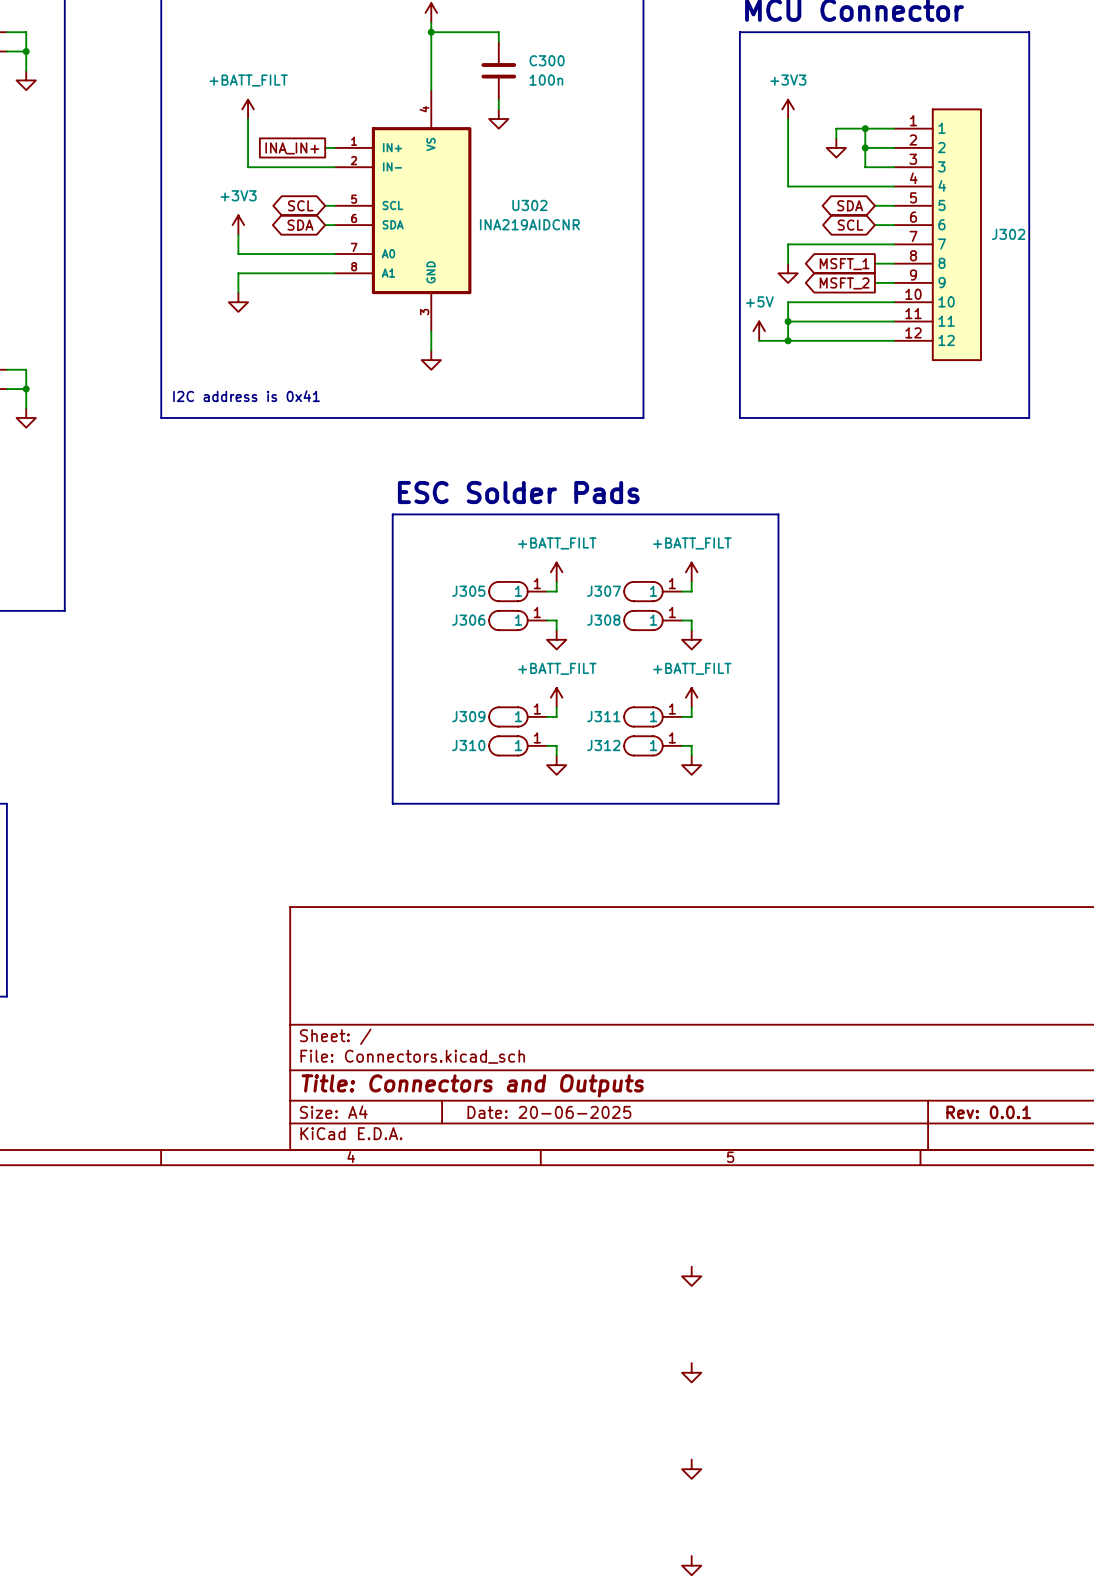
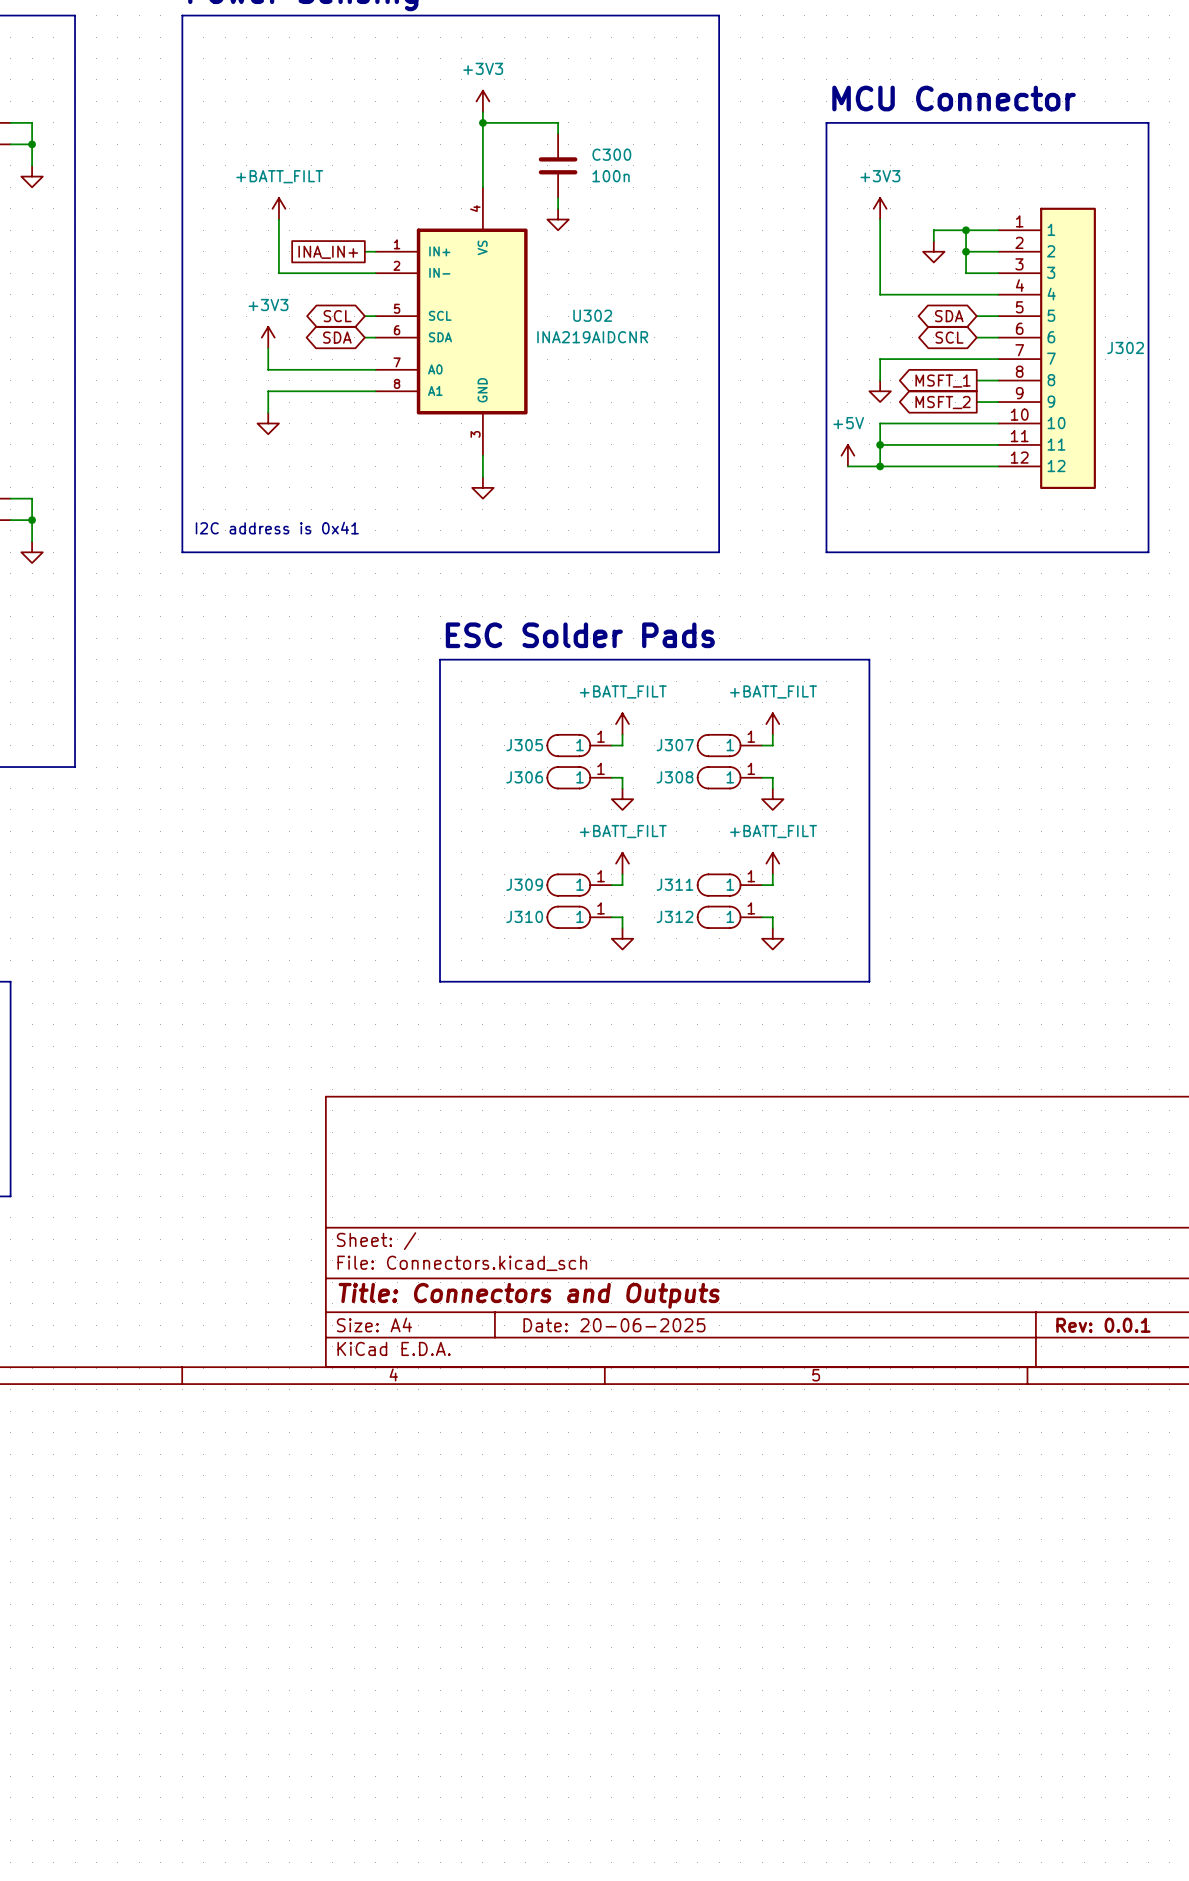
power symbol: (691, 1276) -> none
power symbol: (691, 1372) -> none
power symbol: (691, 1469) -> none
power symbol: (691, 1565) -> none

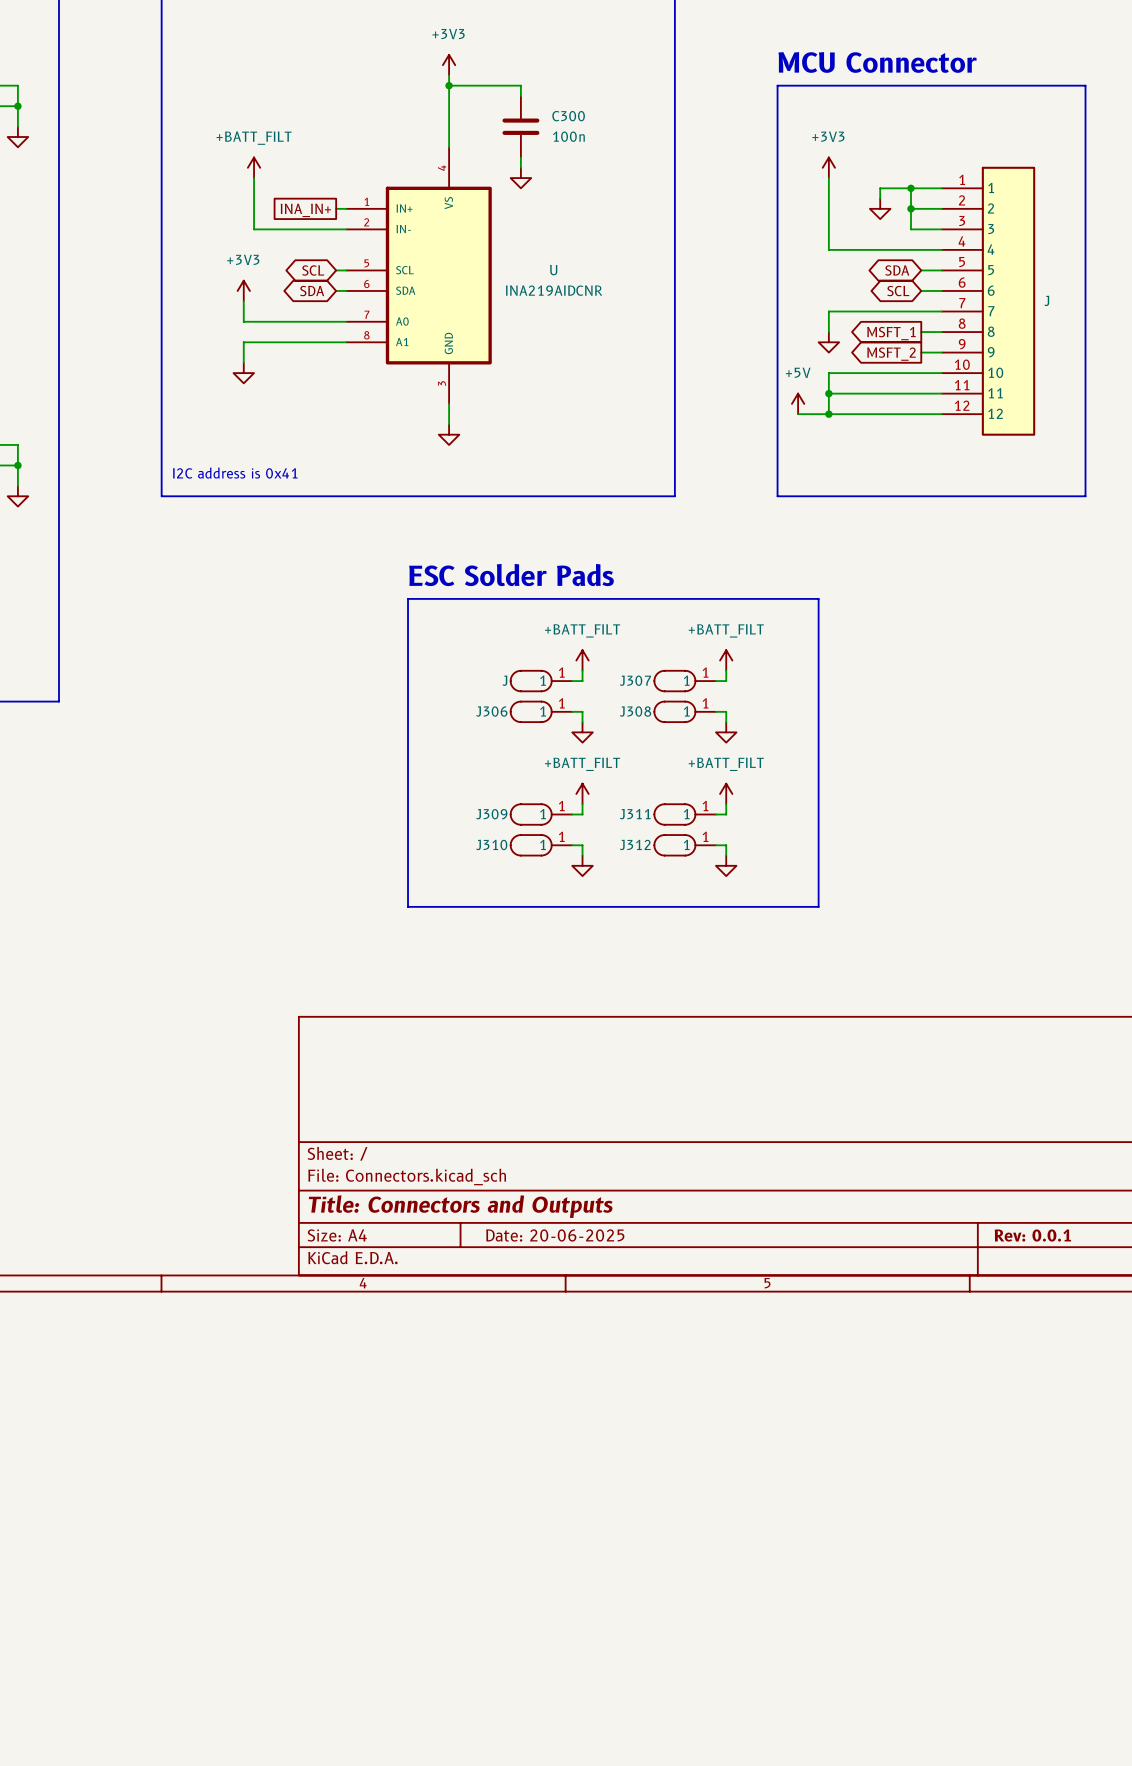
U302 name: U302 (592, 315) -> U (553, 270)
J302 name: J302 (1125, 347) -> J (1046, 300)
J305 name: J305 (524, 745) -> J (504, 680)

